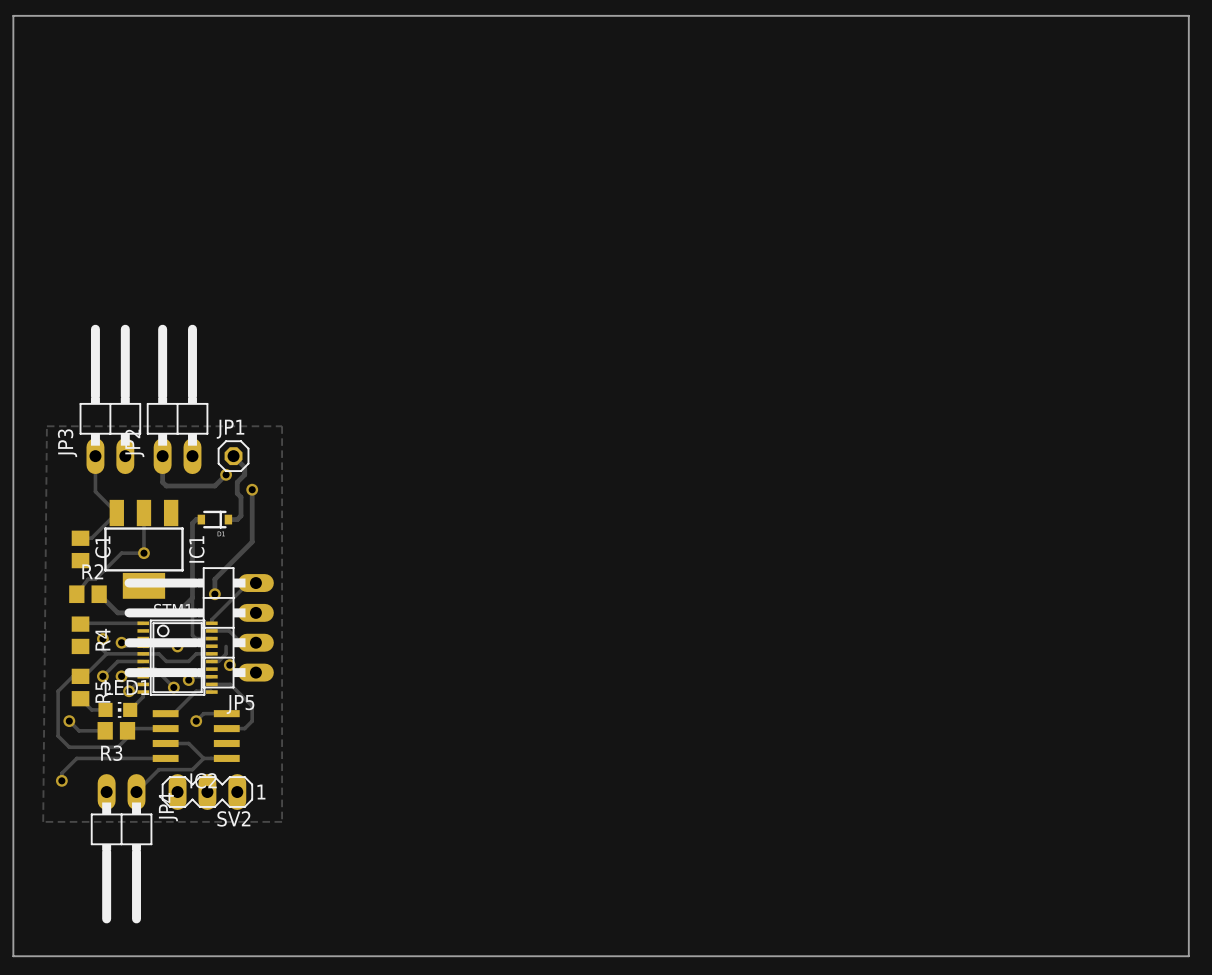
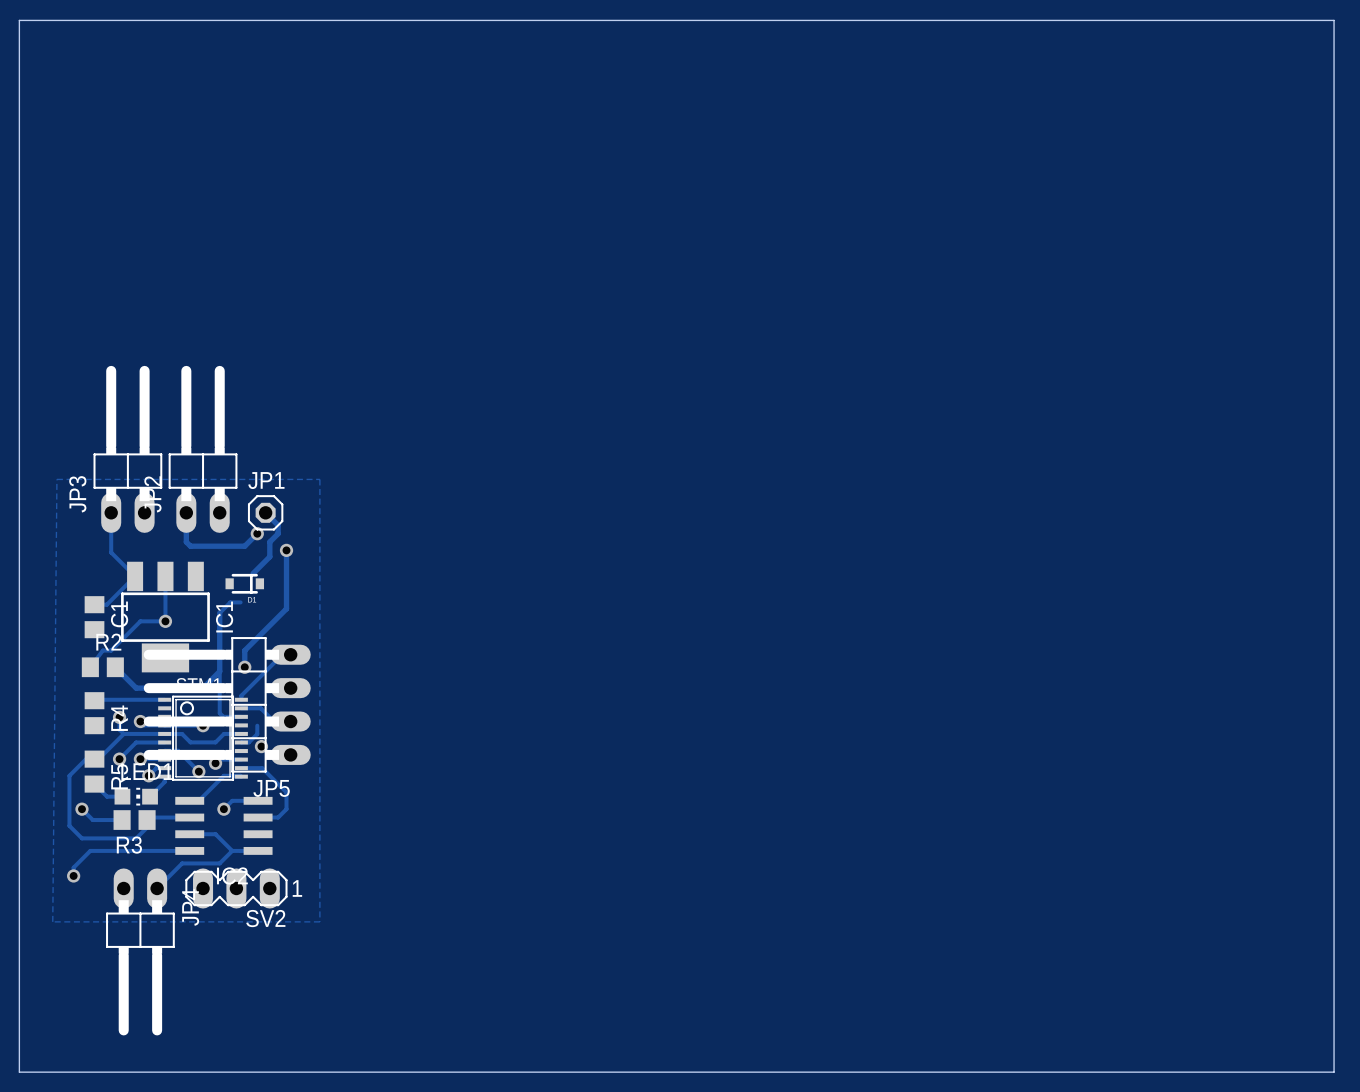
track: (237, 493) (241, 497) (241, 515) (237, 519) (228, 519) -> (269, 554) (253, 573)
track: (201, 519) (196, 519) (192, 523) (192, 545) -> (240, 602) (230, 602) (219, 613)

